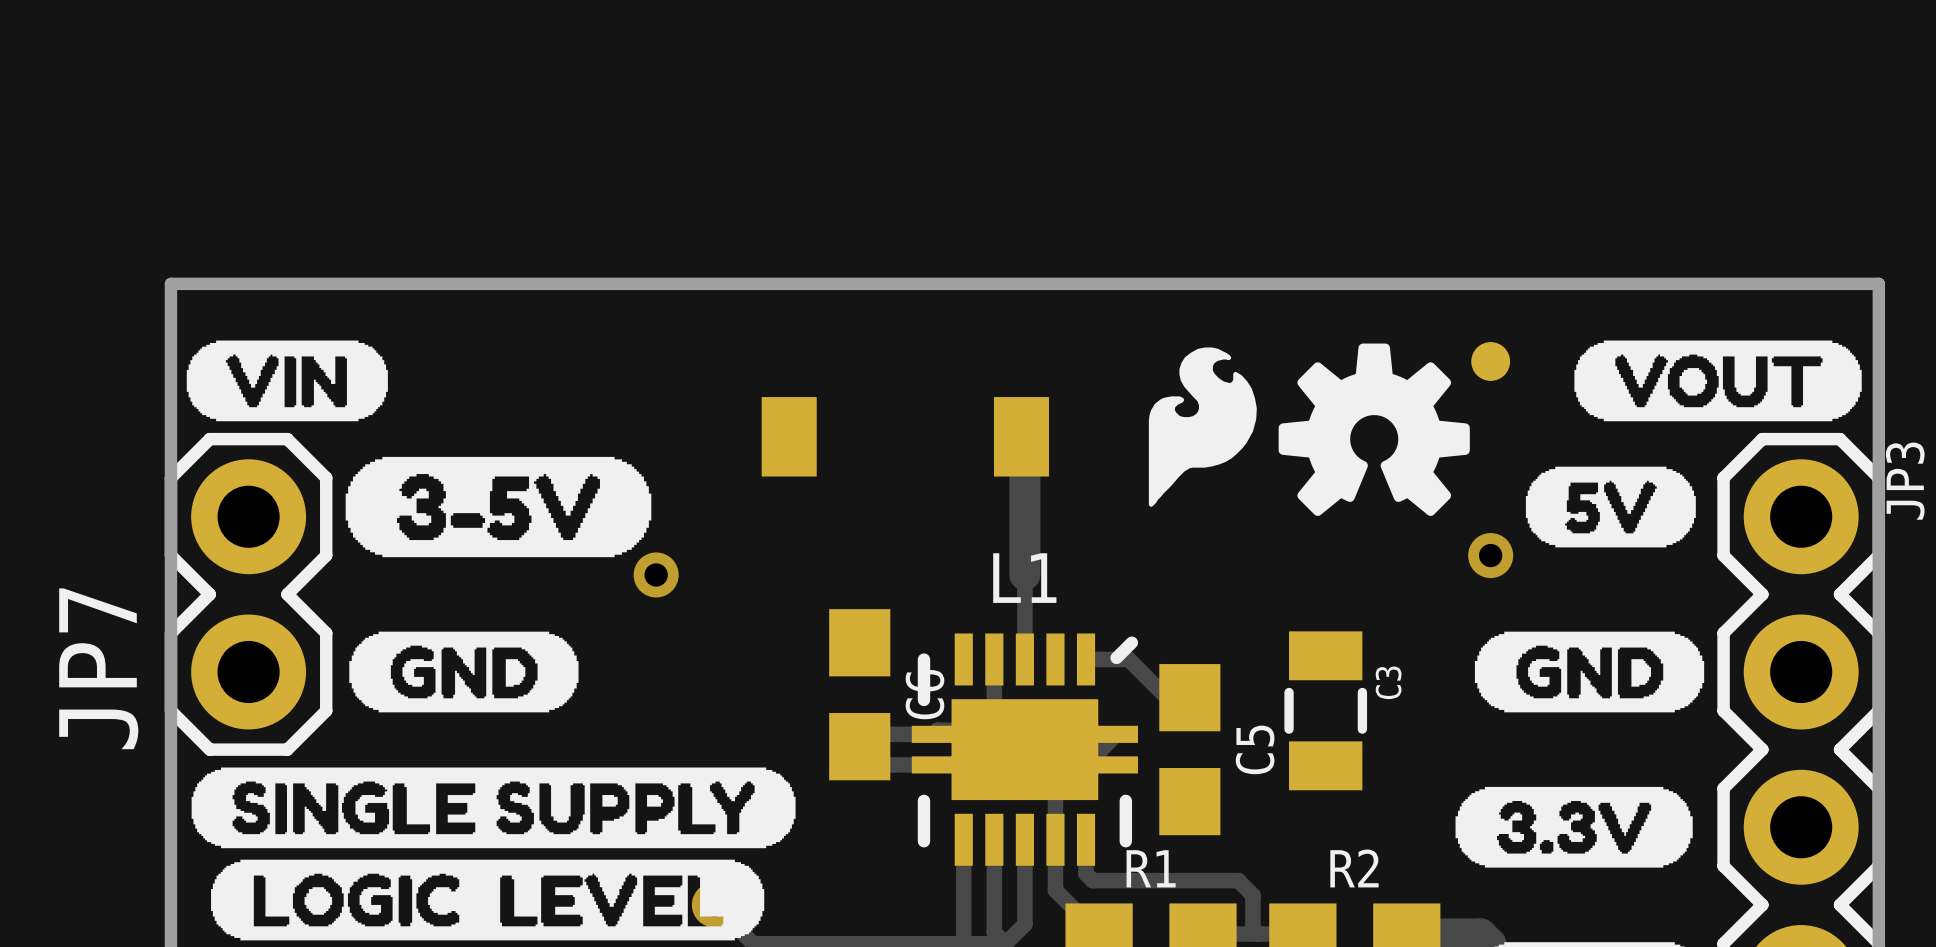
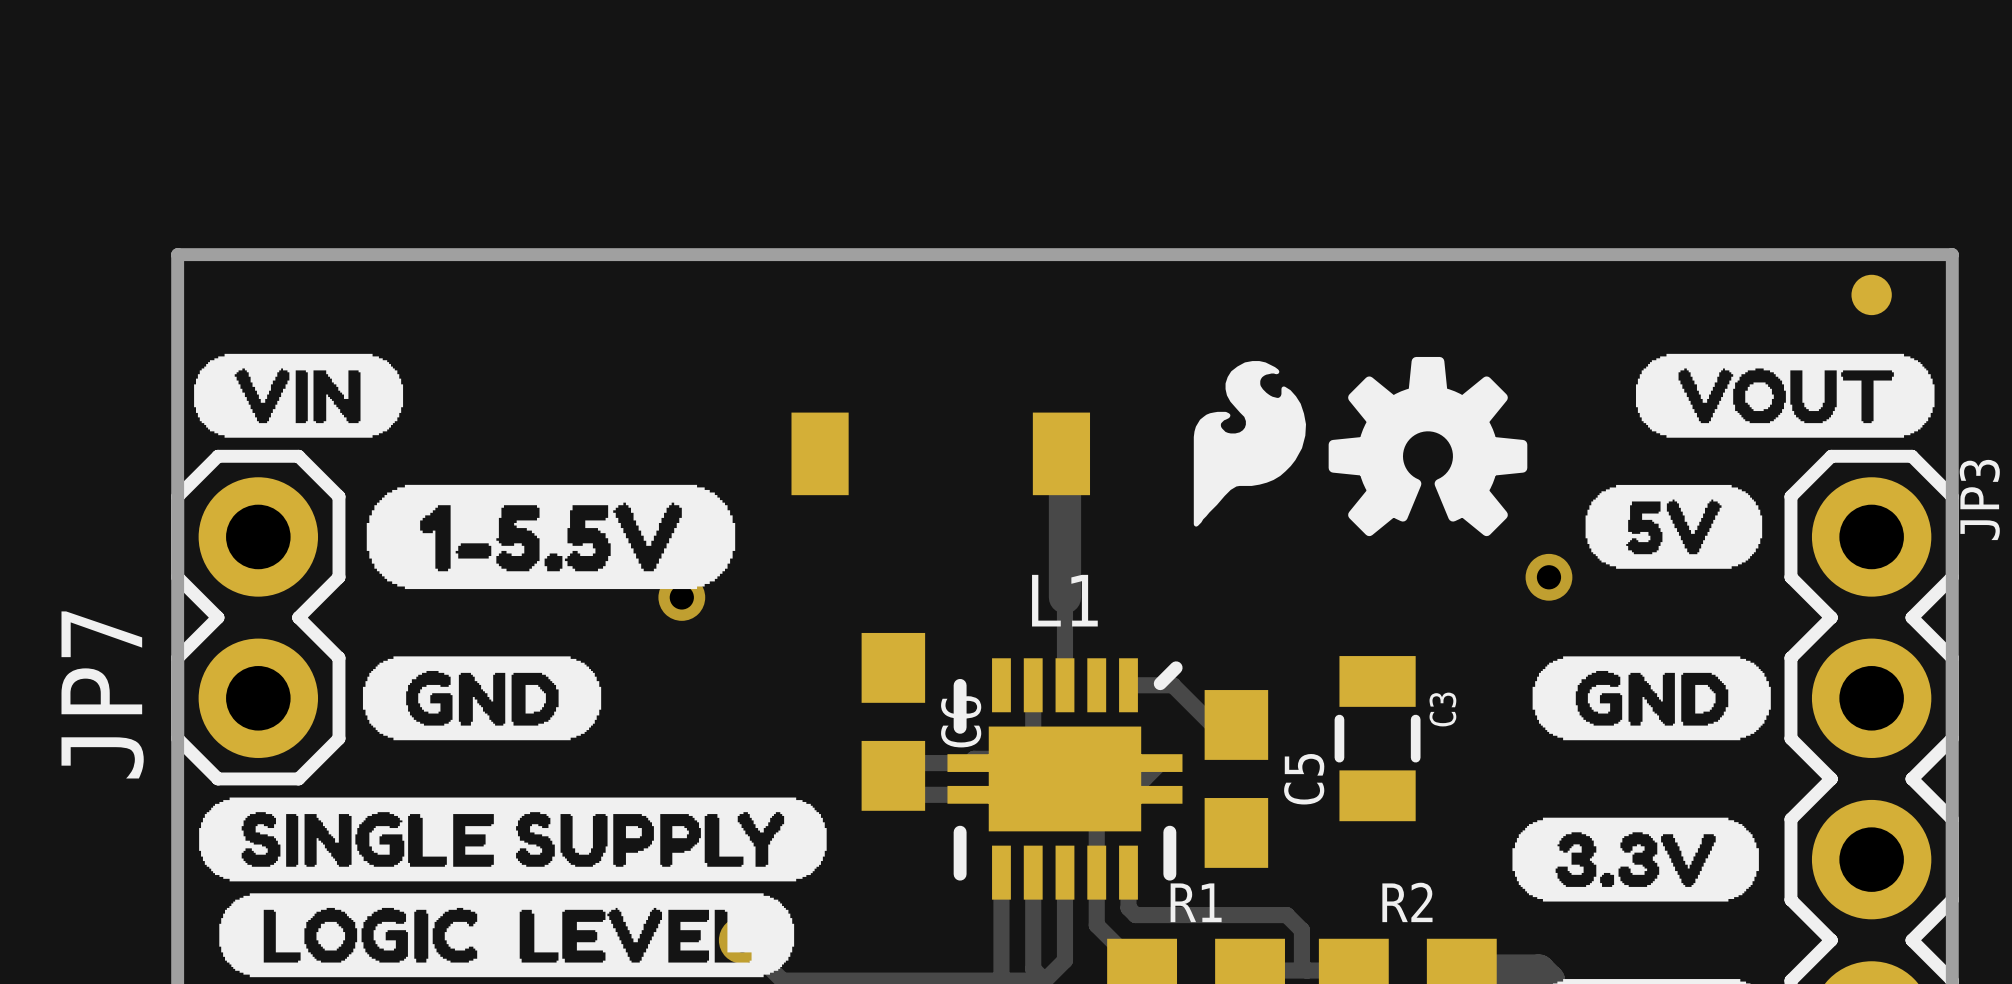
board edge: (170, 283) (1878, 283) -> (177, 294) (177, 254) (1952, 254) (1952, 294)
part position: (1490, 361) -> (1871, 294)
drawing shape: [345, 456, 652, 558] -> [366, 484, 736, 590]

